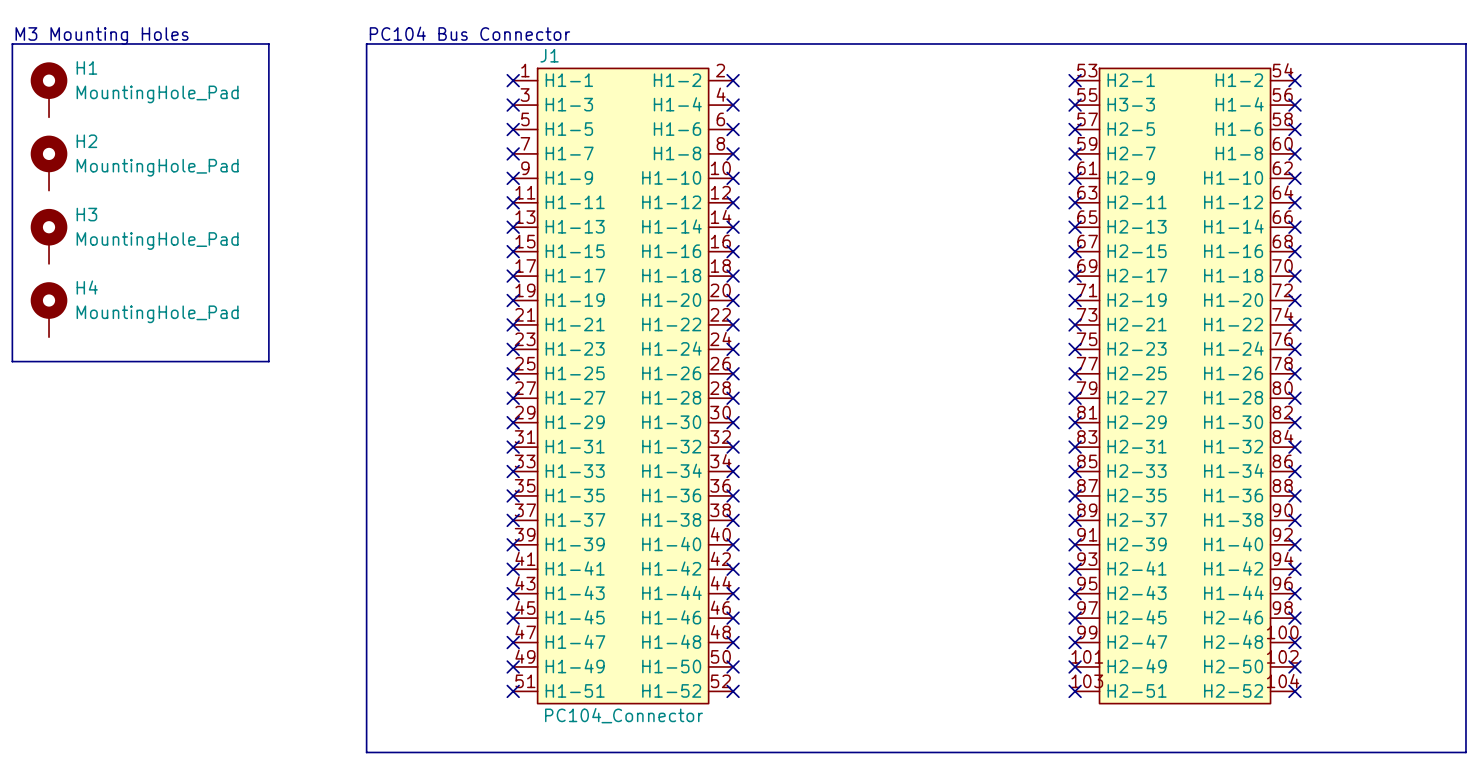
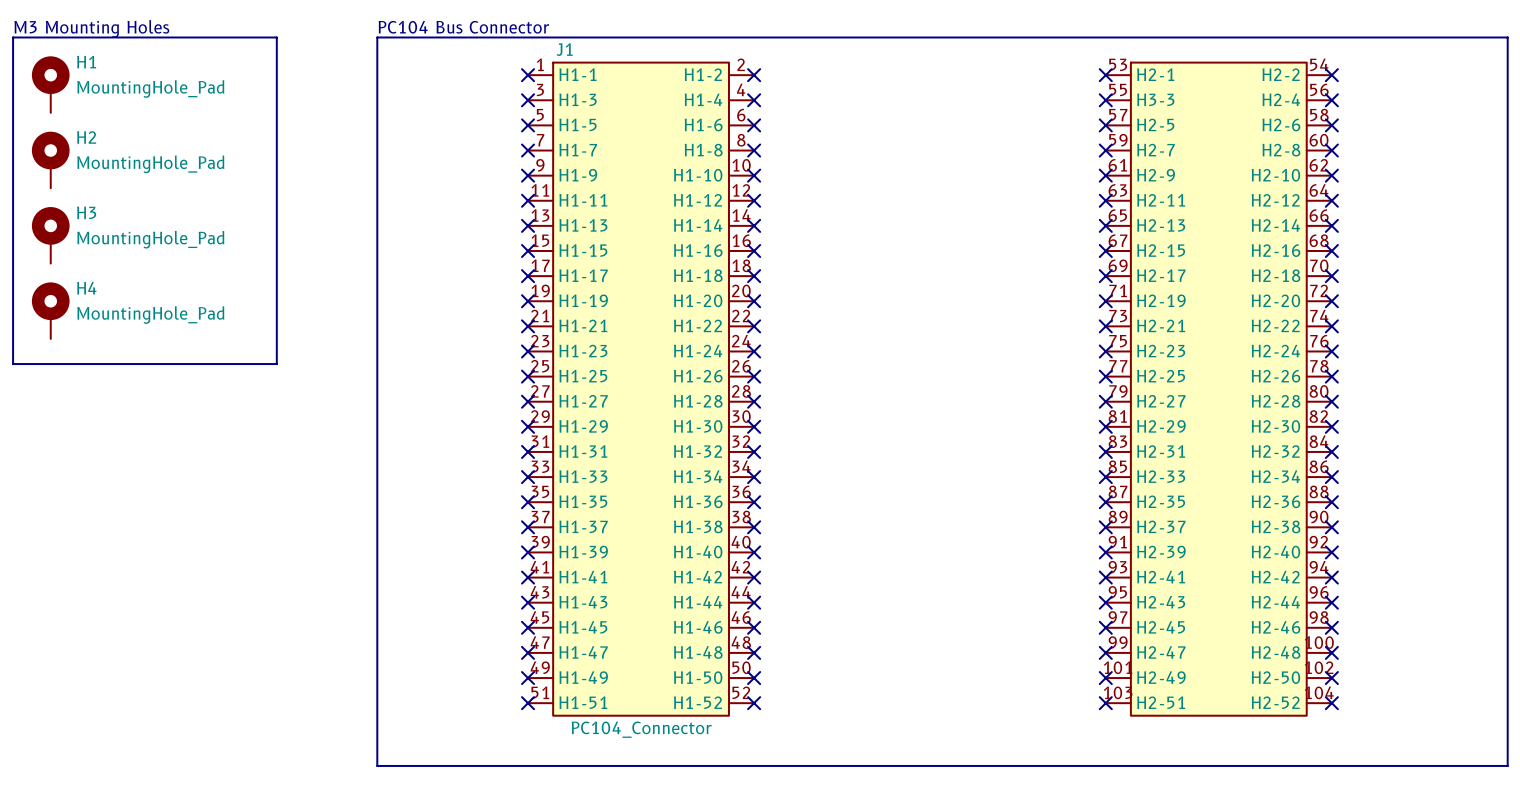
J1 symbol: [513, 68, 1295, 704] -> [528, 62, 1332, 716]

